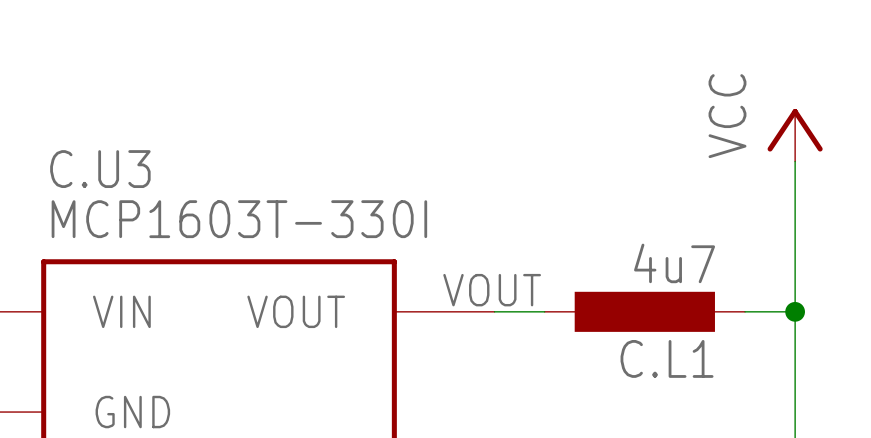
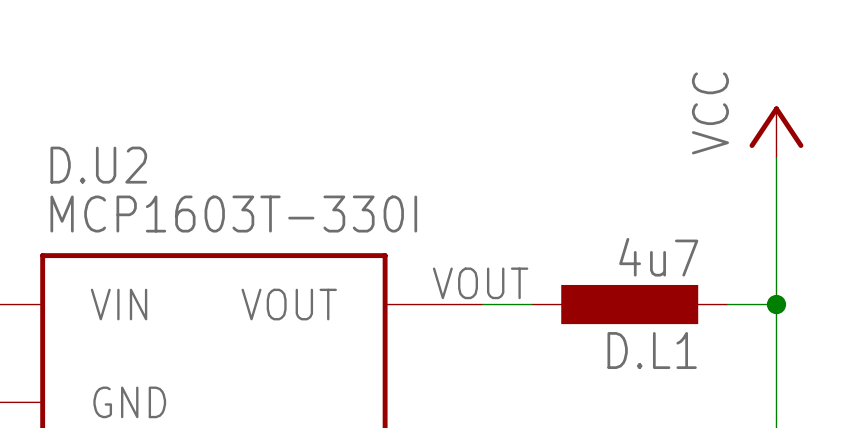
C.U3 name: C.U3 (100, 169) -> D.U2 (98, 165)
C.L1 name: C.L1 (667, 358) -> D.L1 (652, 350)

